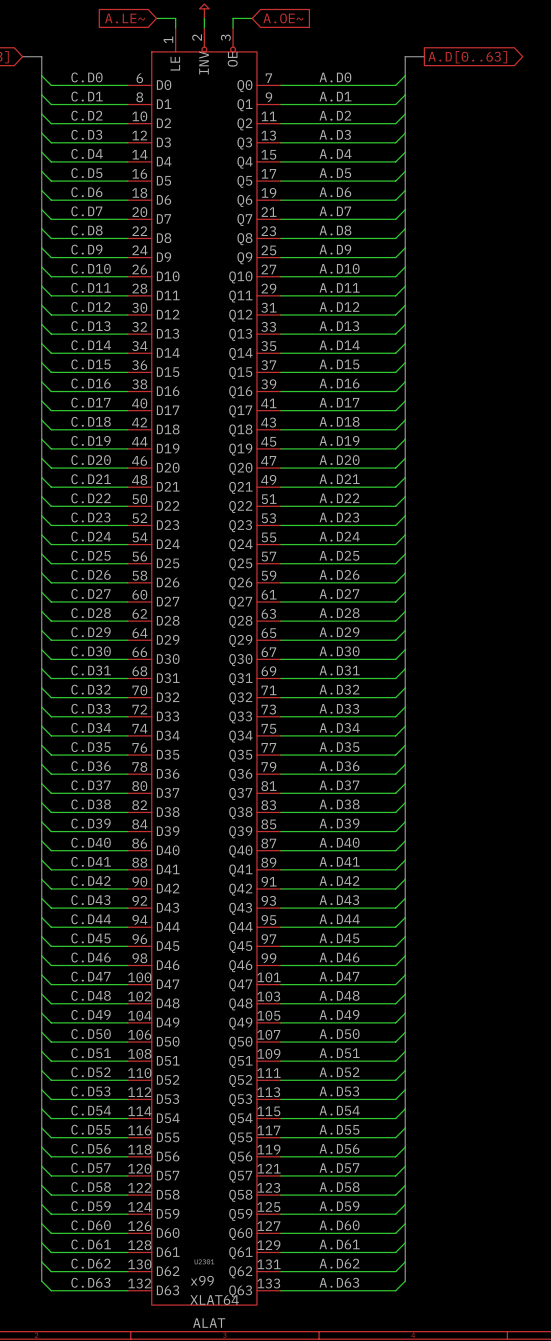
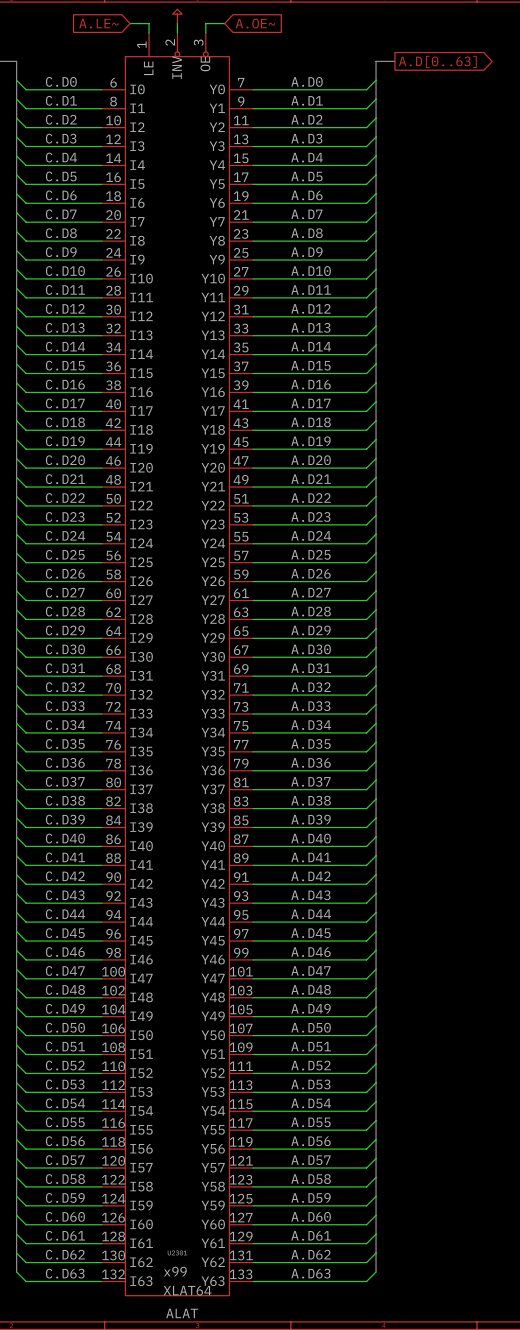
part symbol: [127, 28, 281, 1306] -> [101, 33, 254, 1296]

